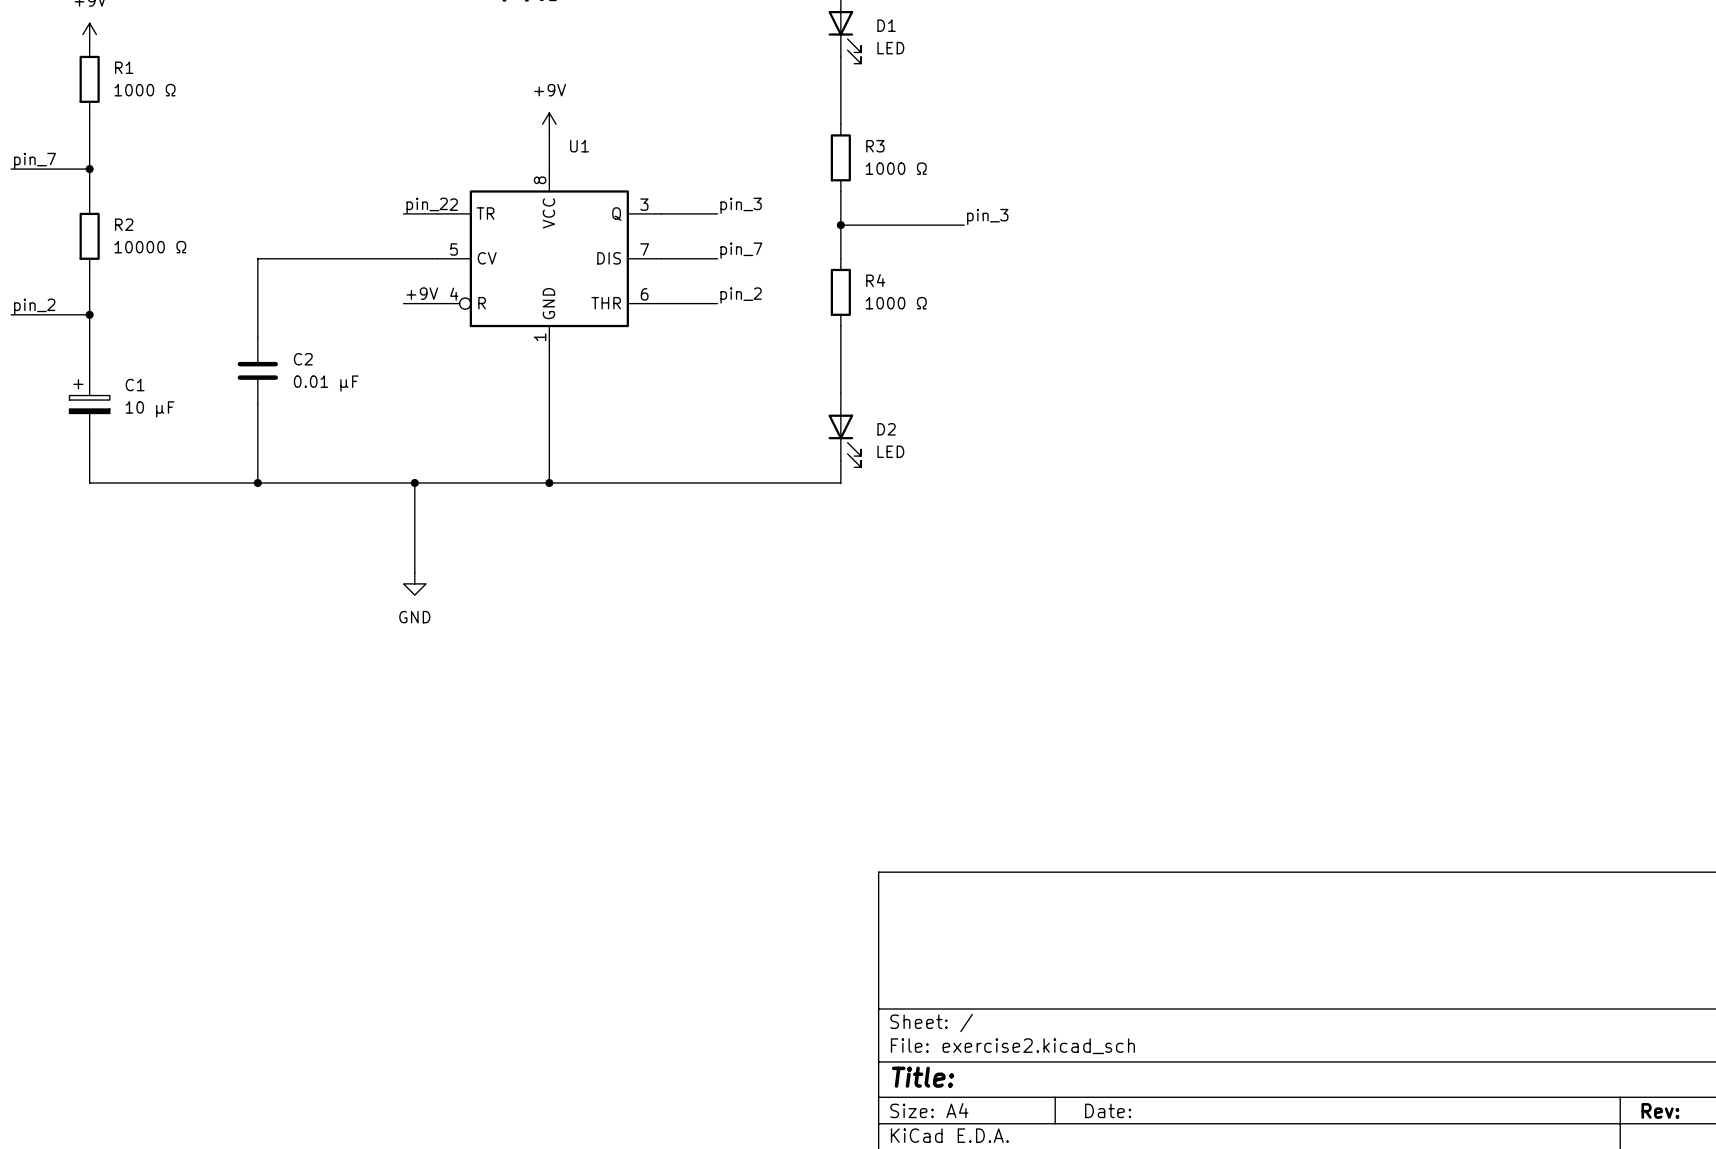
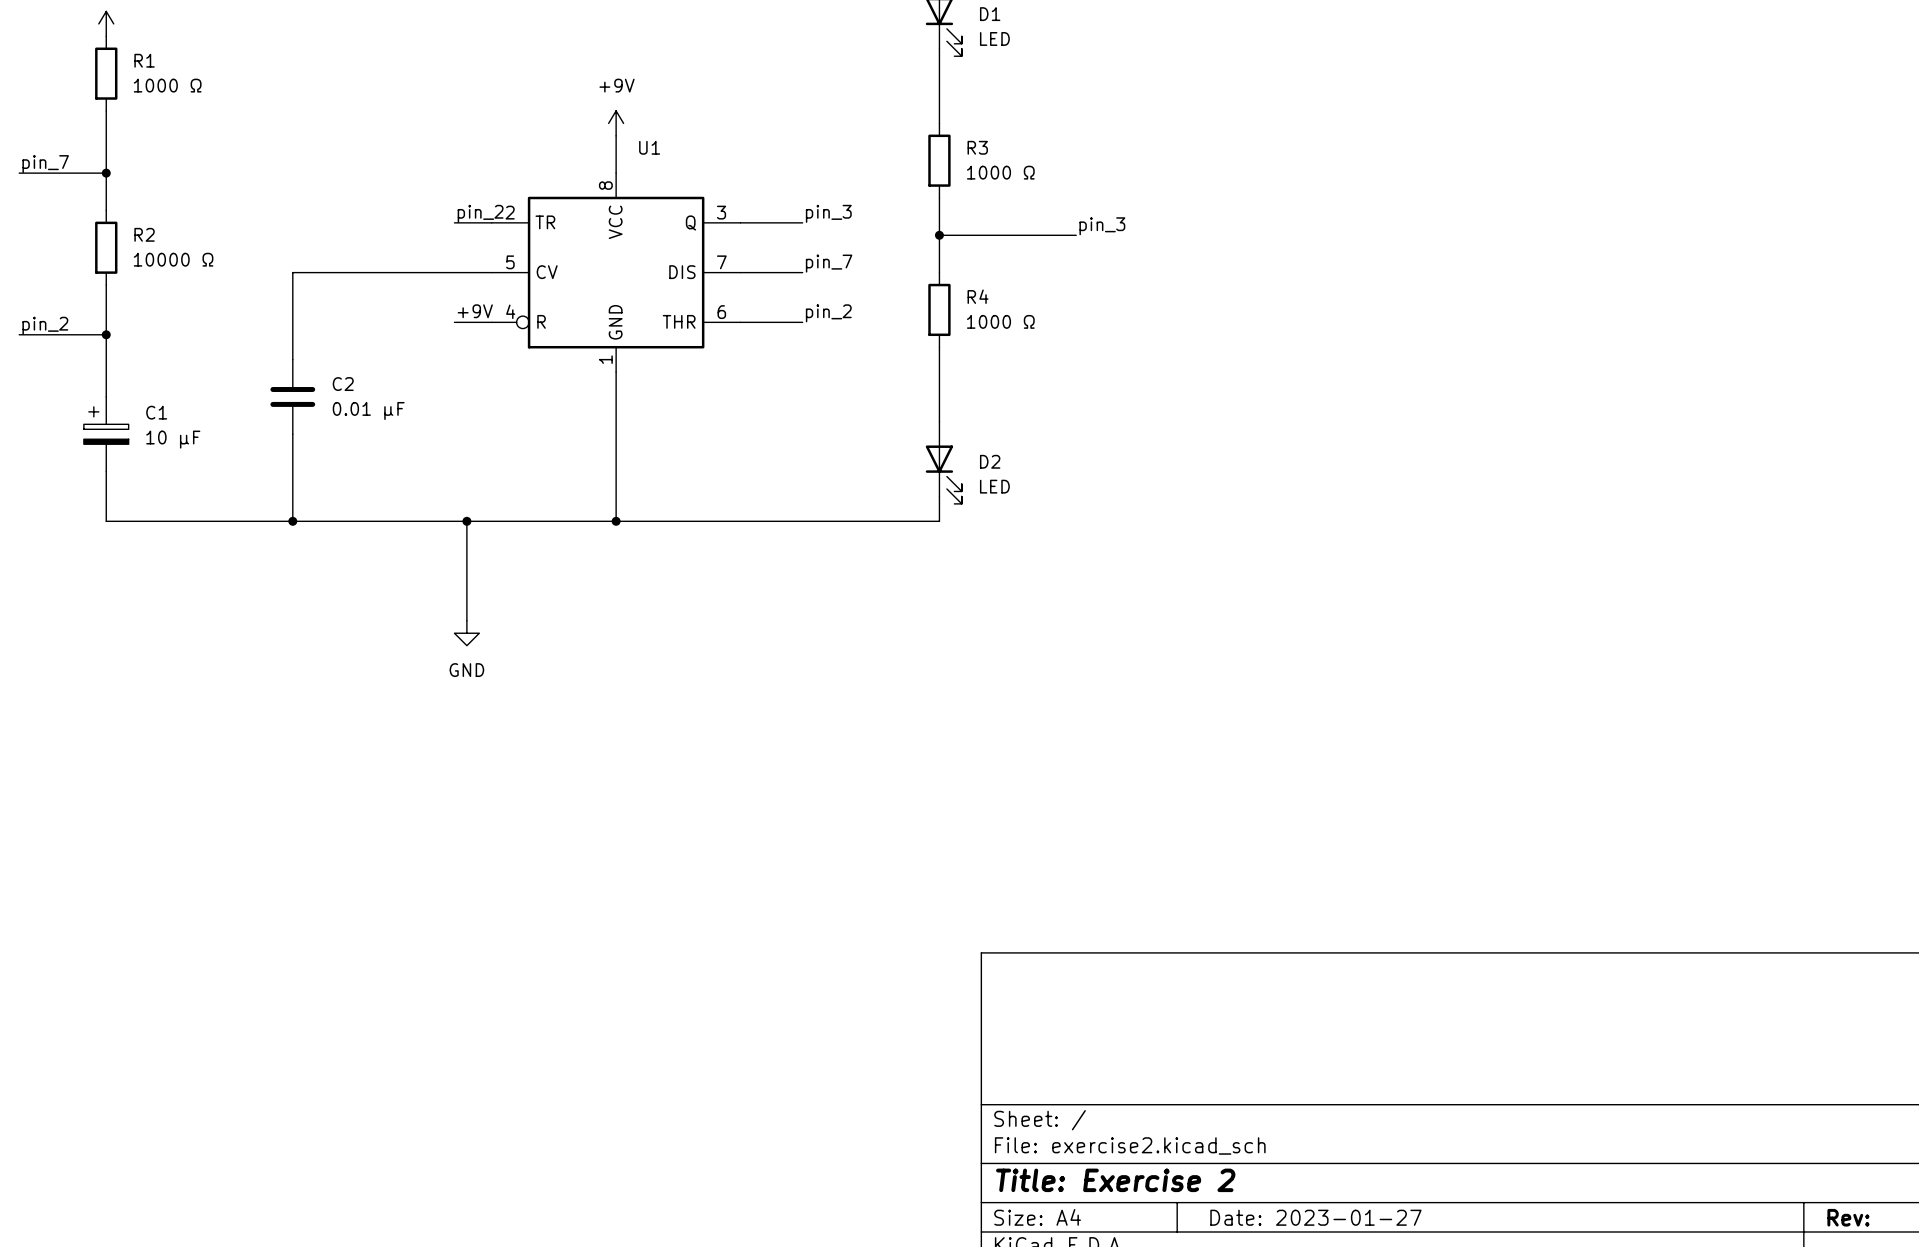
title block: Title: (923, 1077) -> Title: Exercise 2 (1115, 1180)
title block: Date: (1108, 1110) -> Date: 2023-01-27 (1315, 1217)

